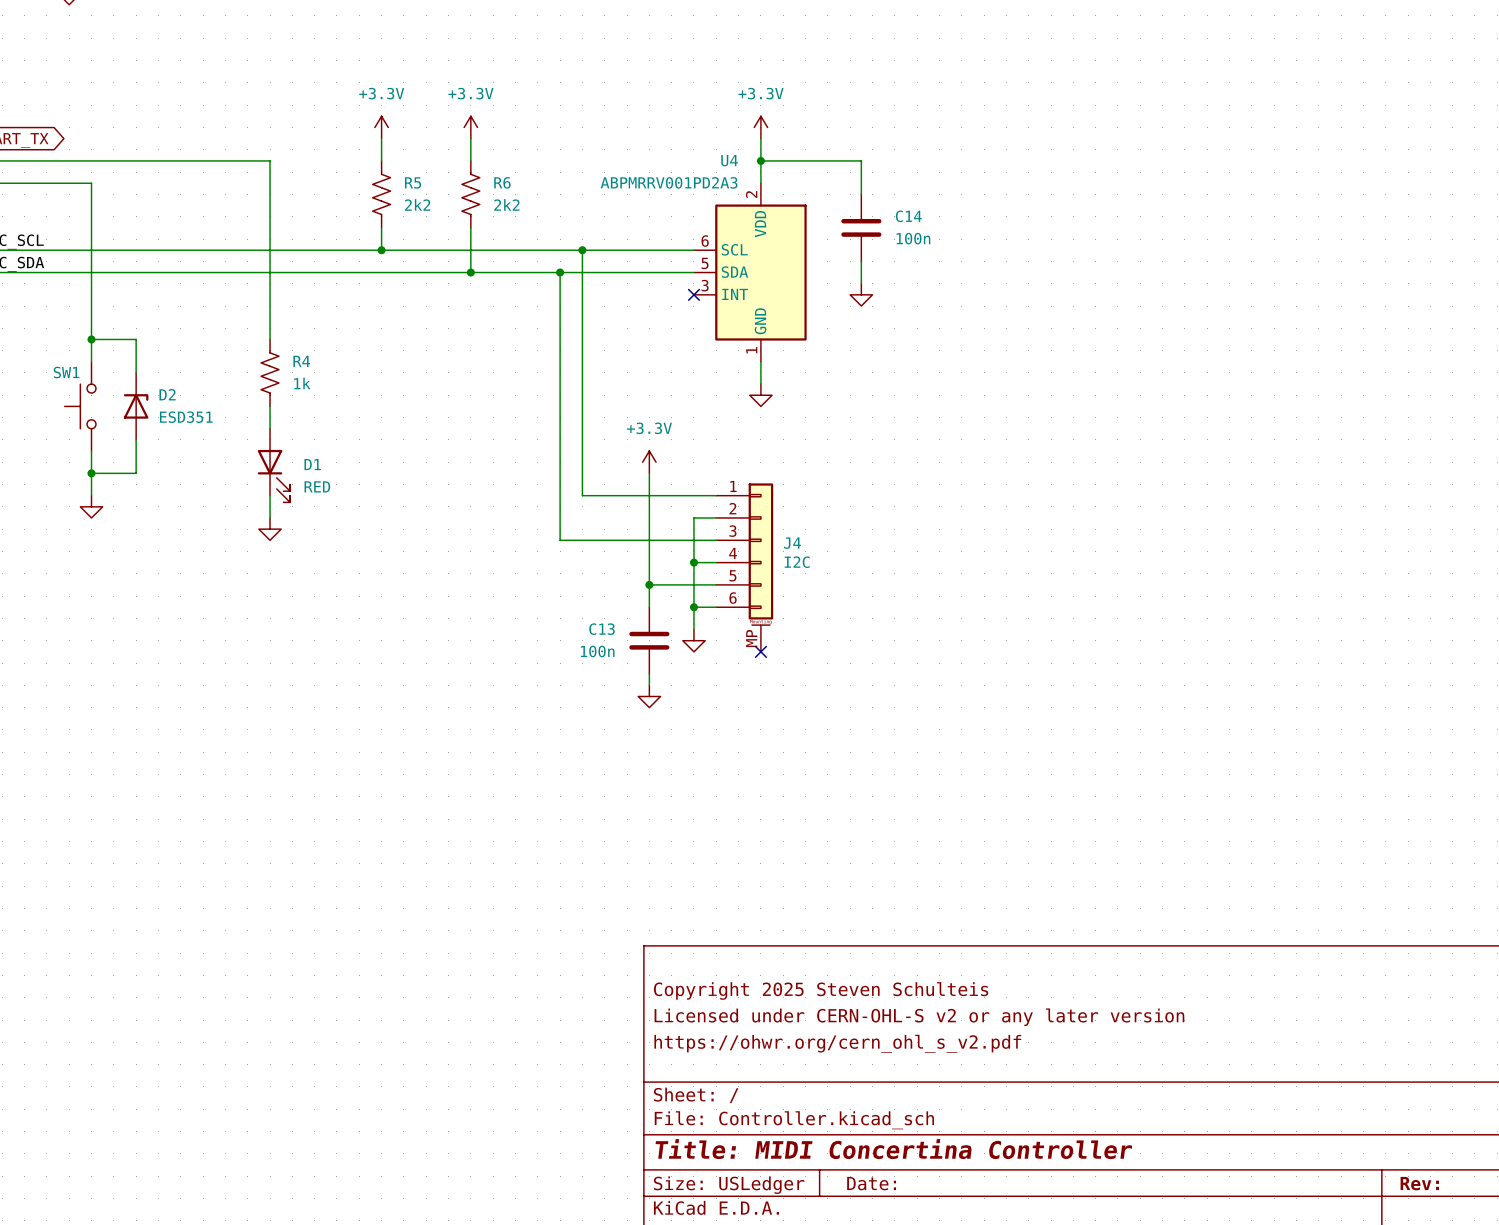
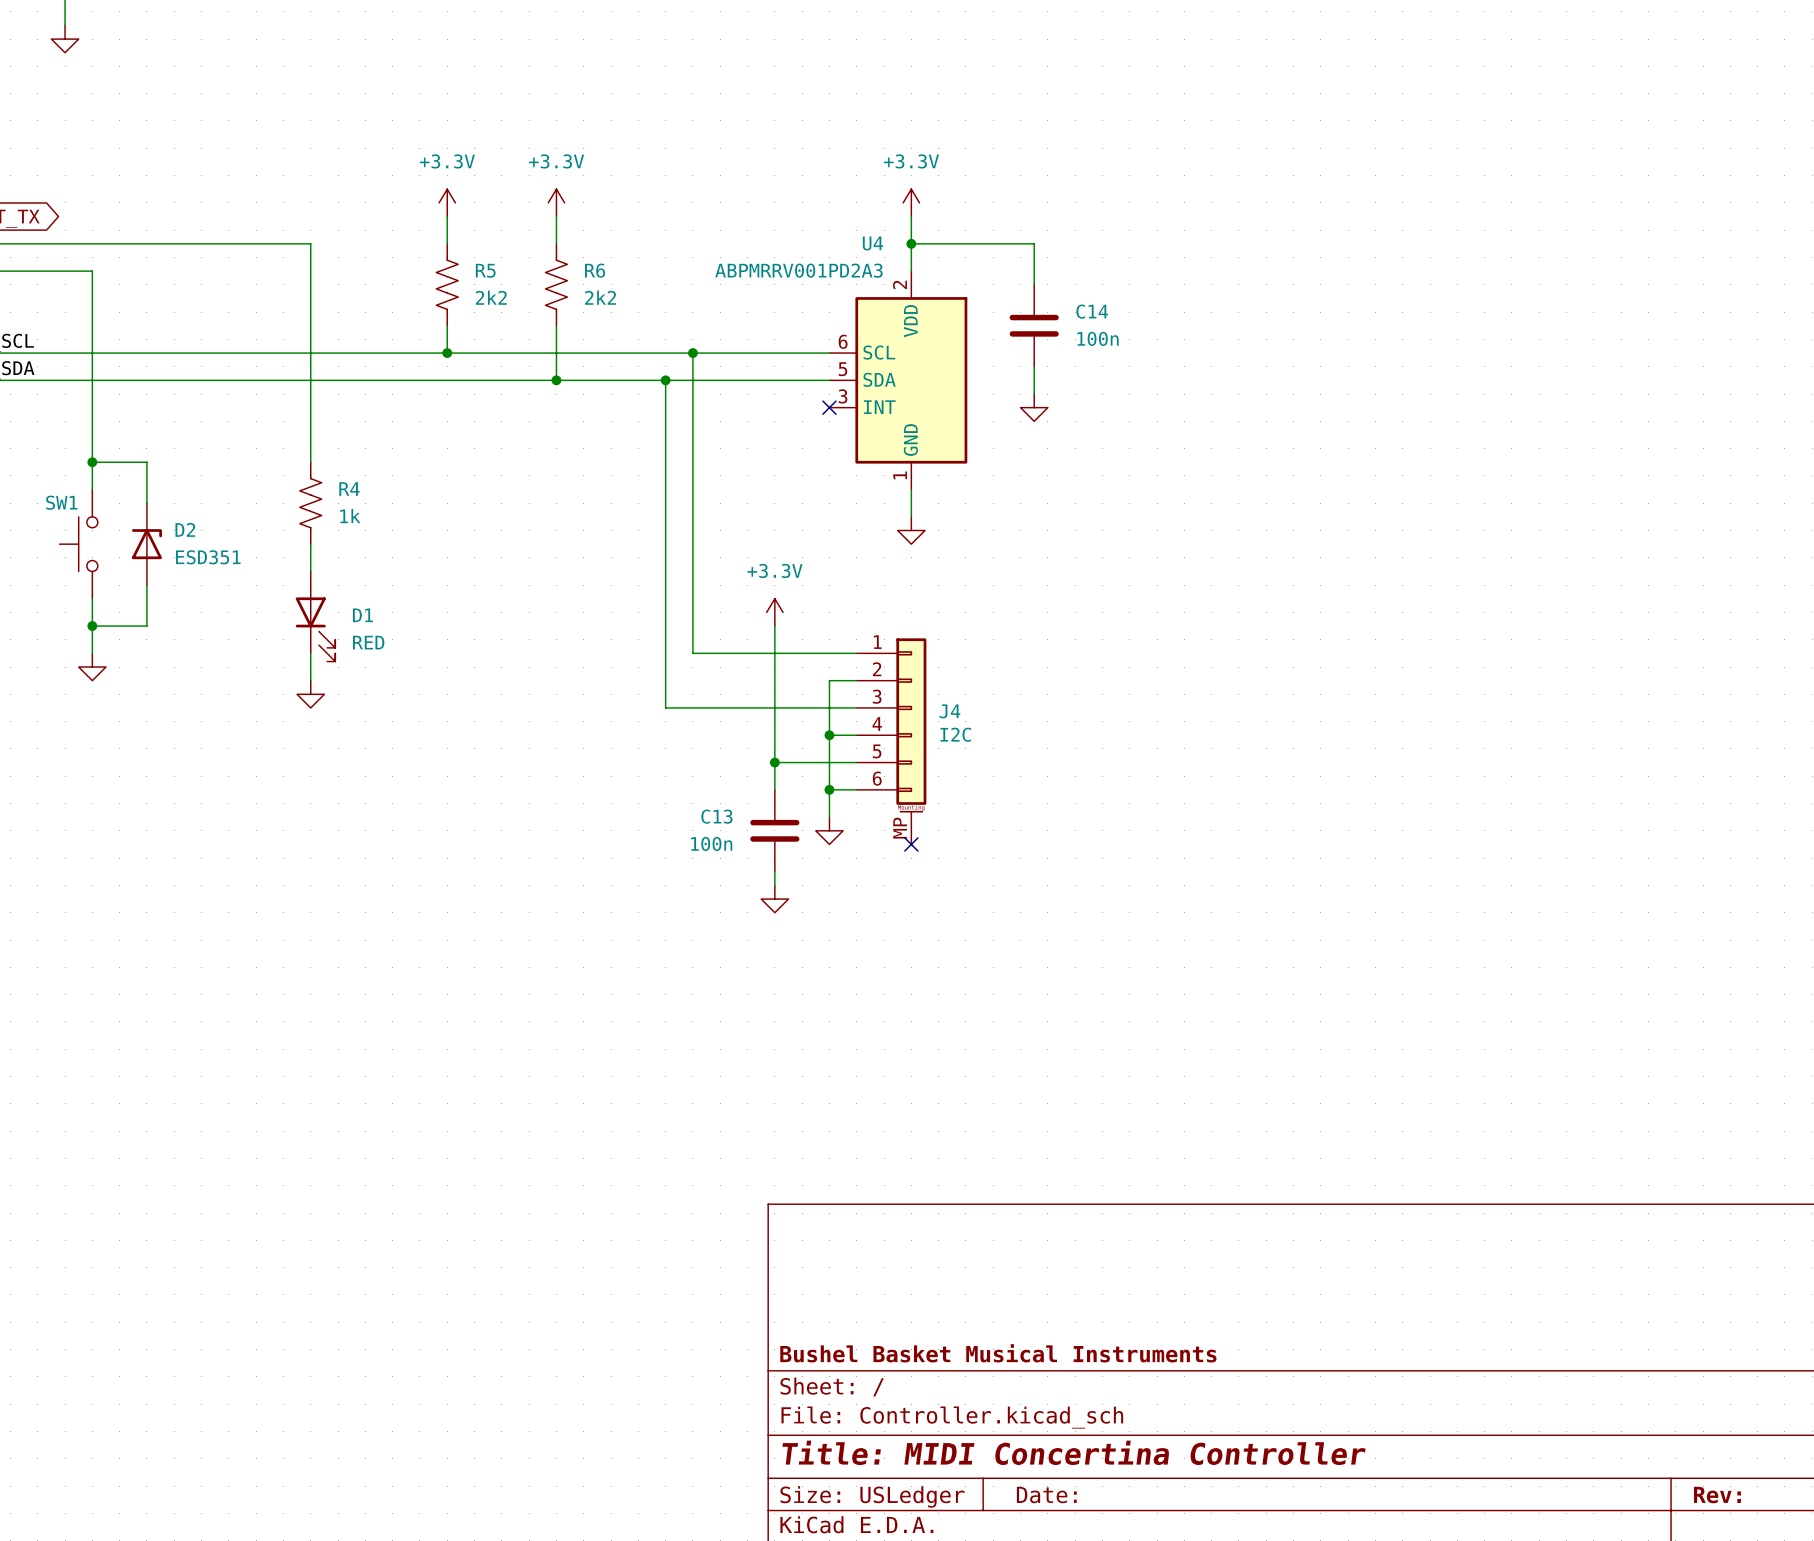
title block: Copyright 2025 Steven Schulteis (821, 990) -> none
title block: Licensed under CERN-OHL-S v2 or any later version (919, 1017) -> none
title block: https://ohwr.org/cern_ohl_s_v2.pdf (837, 1043) -> none
title block: none -> Bushel Basket Musical Instruments (998, 1353)

